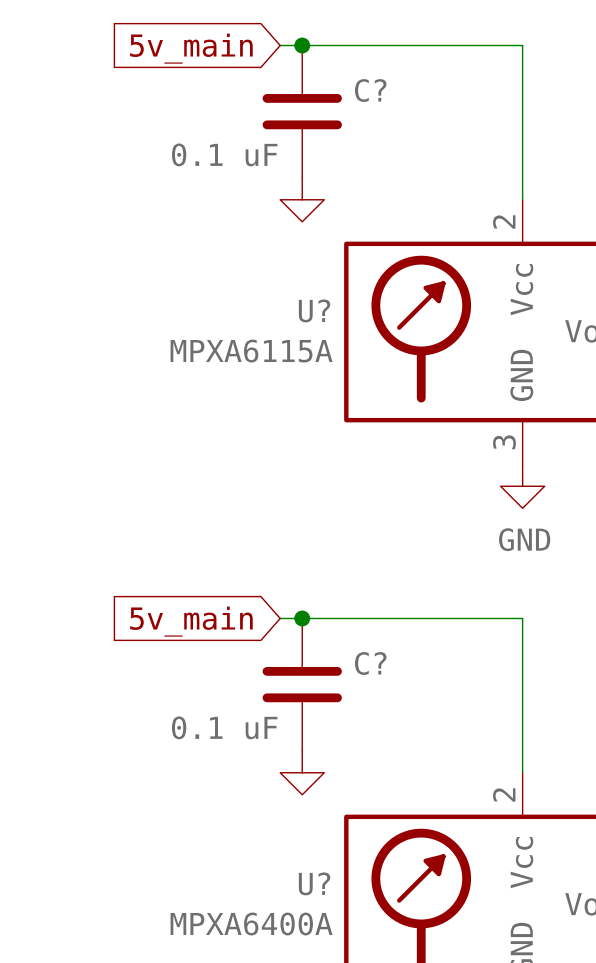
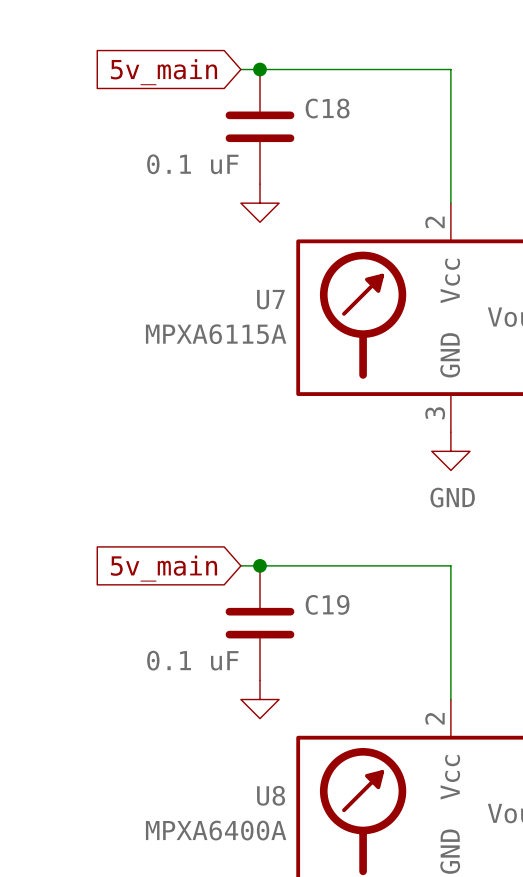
C? name: C? (370, 90) -> C18 (327, 108)
U? name: U? (314, 310) -> U7 (270, 299)
C? name: C? (370, 663) -> C19 (327, 604)
U? name: U? (314, 883) -> U8 (271, 795)

